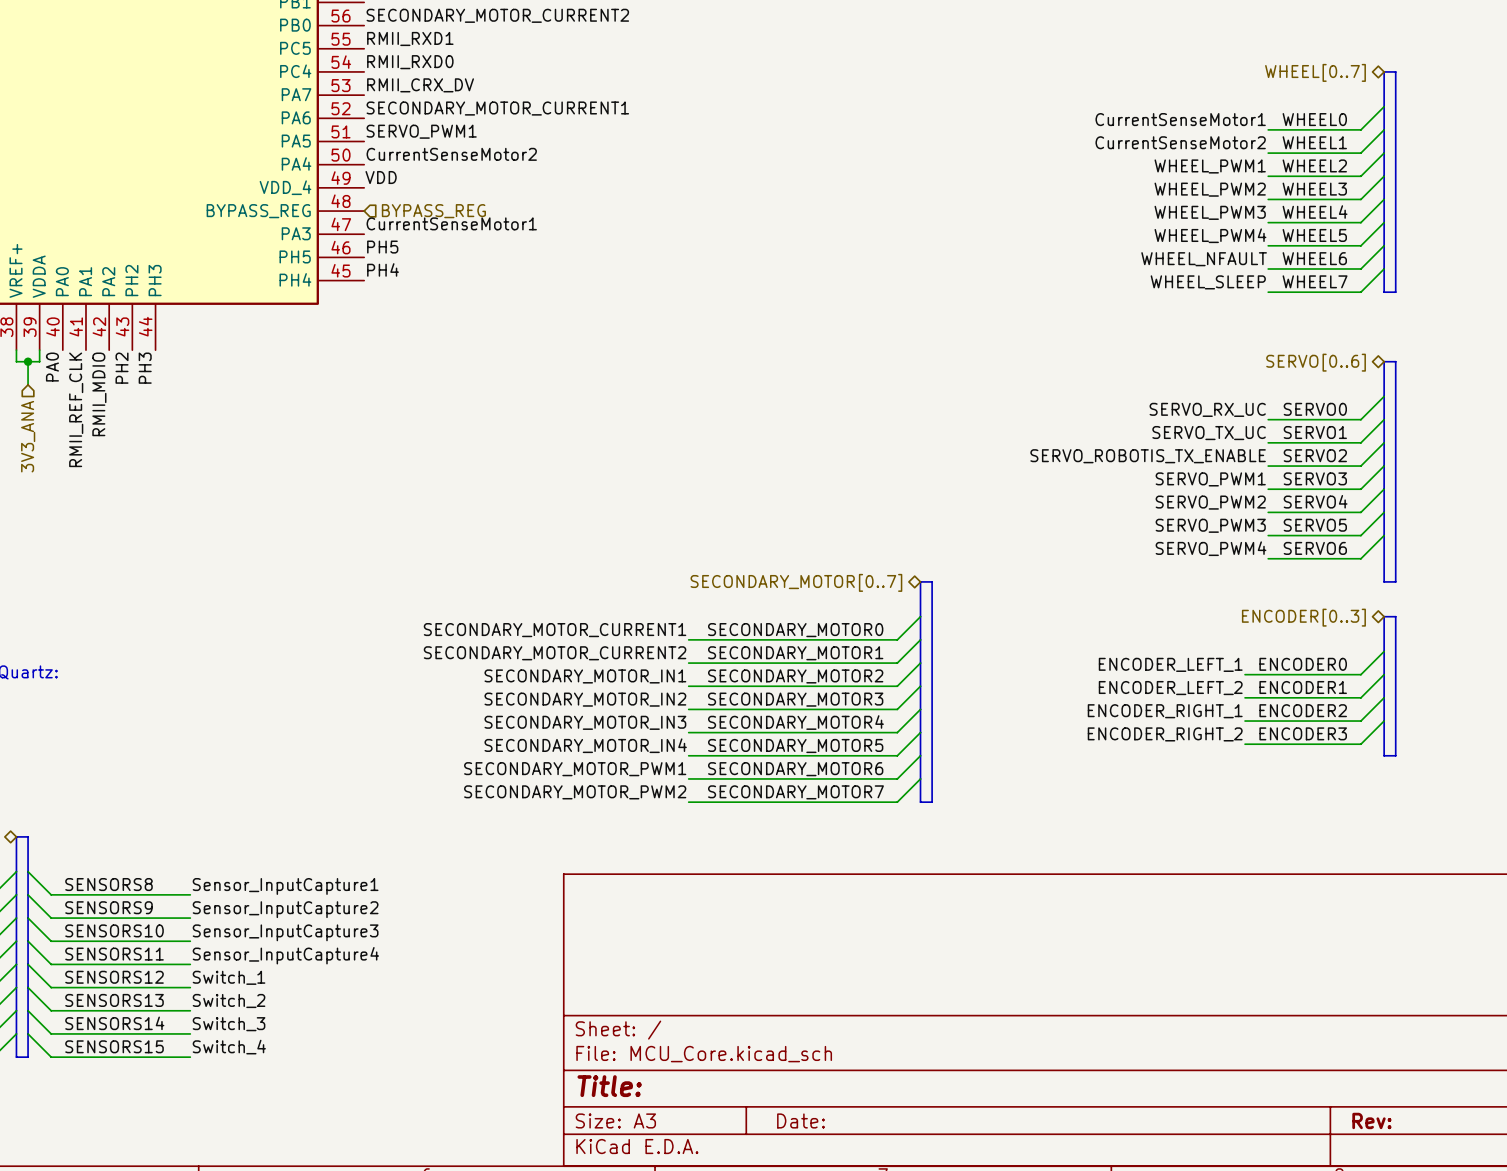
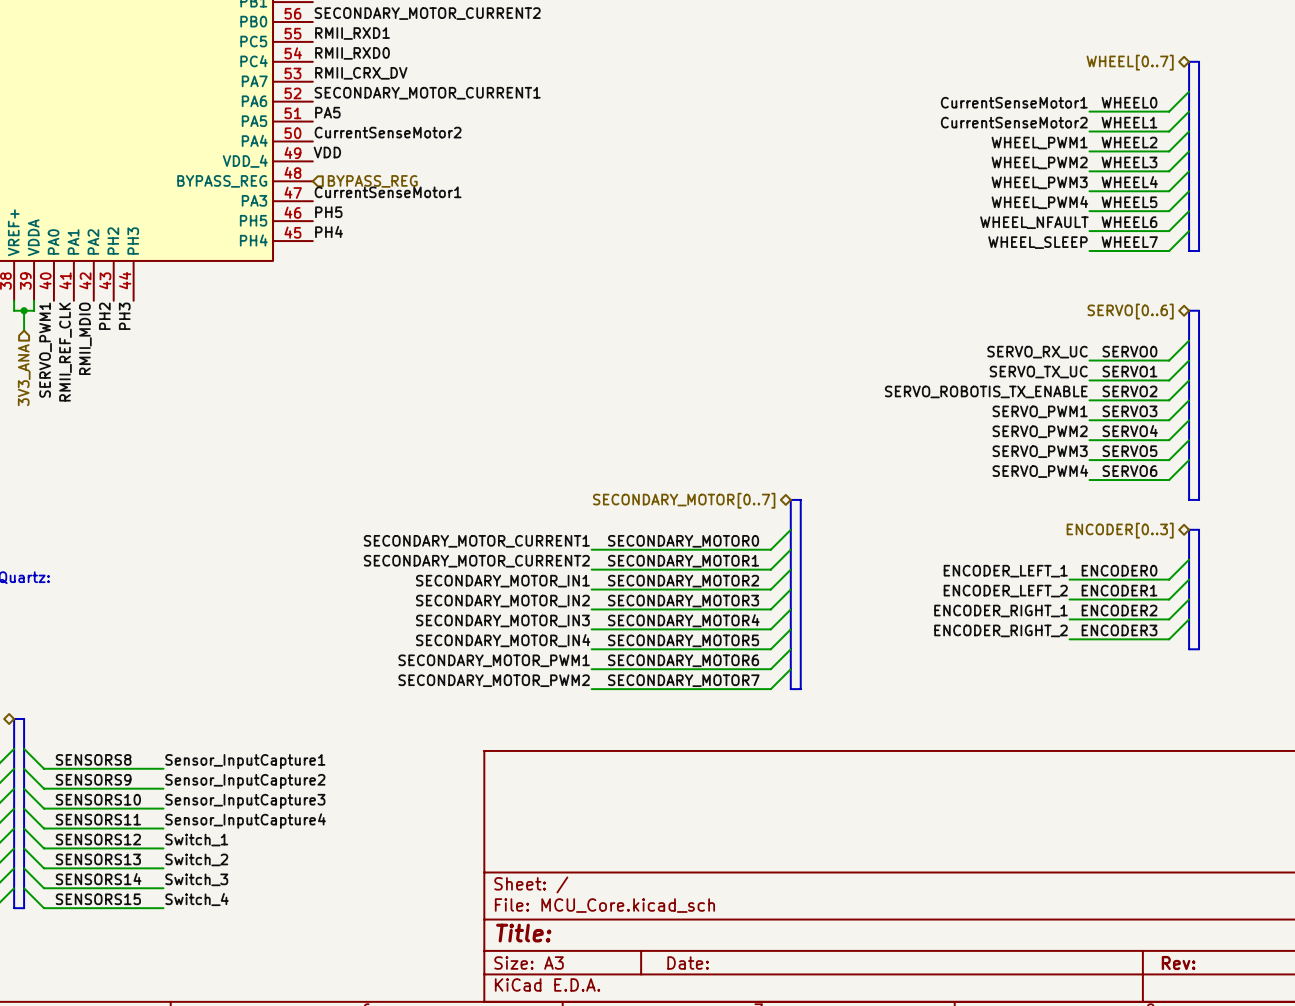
label: SERVO_PWM1 (421, 131) -> PA5 (327, 112)
label: PA0 (52, 367) -> SERVO_PWM1 (45, 350)

